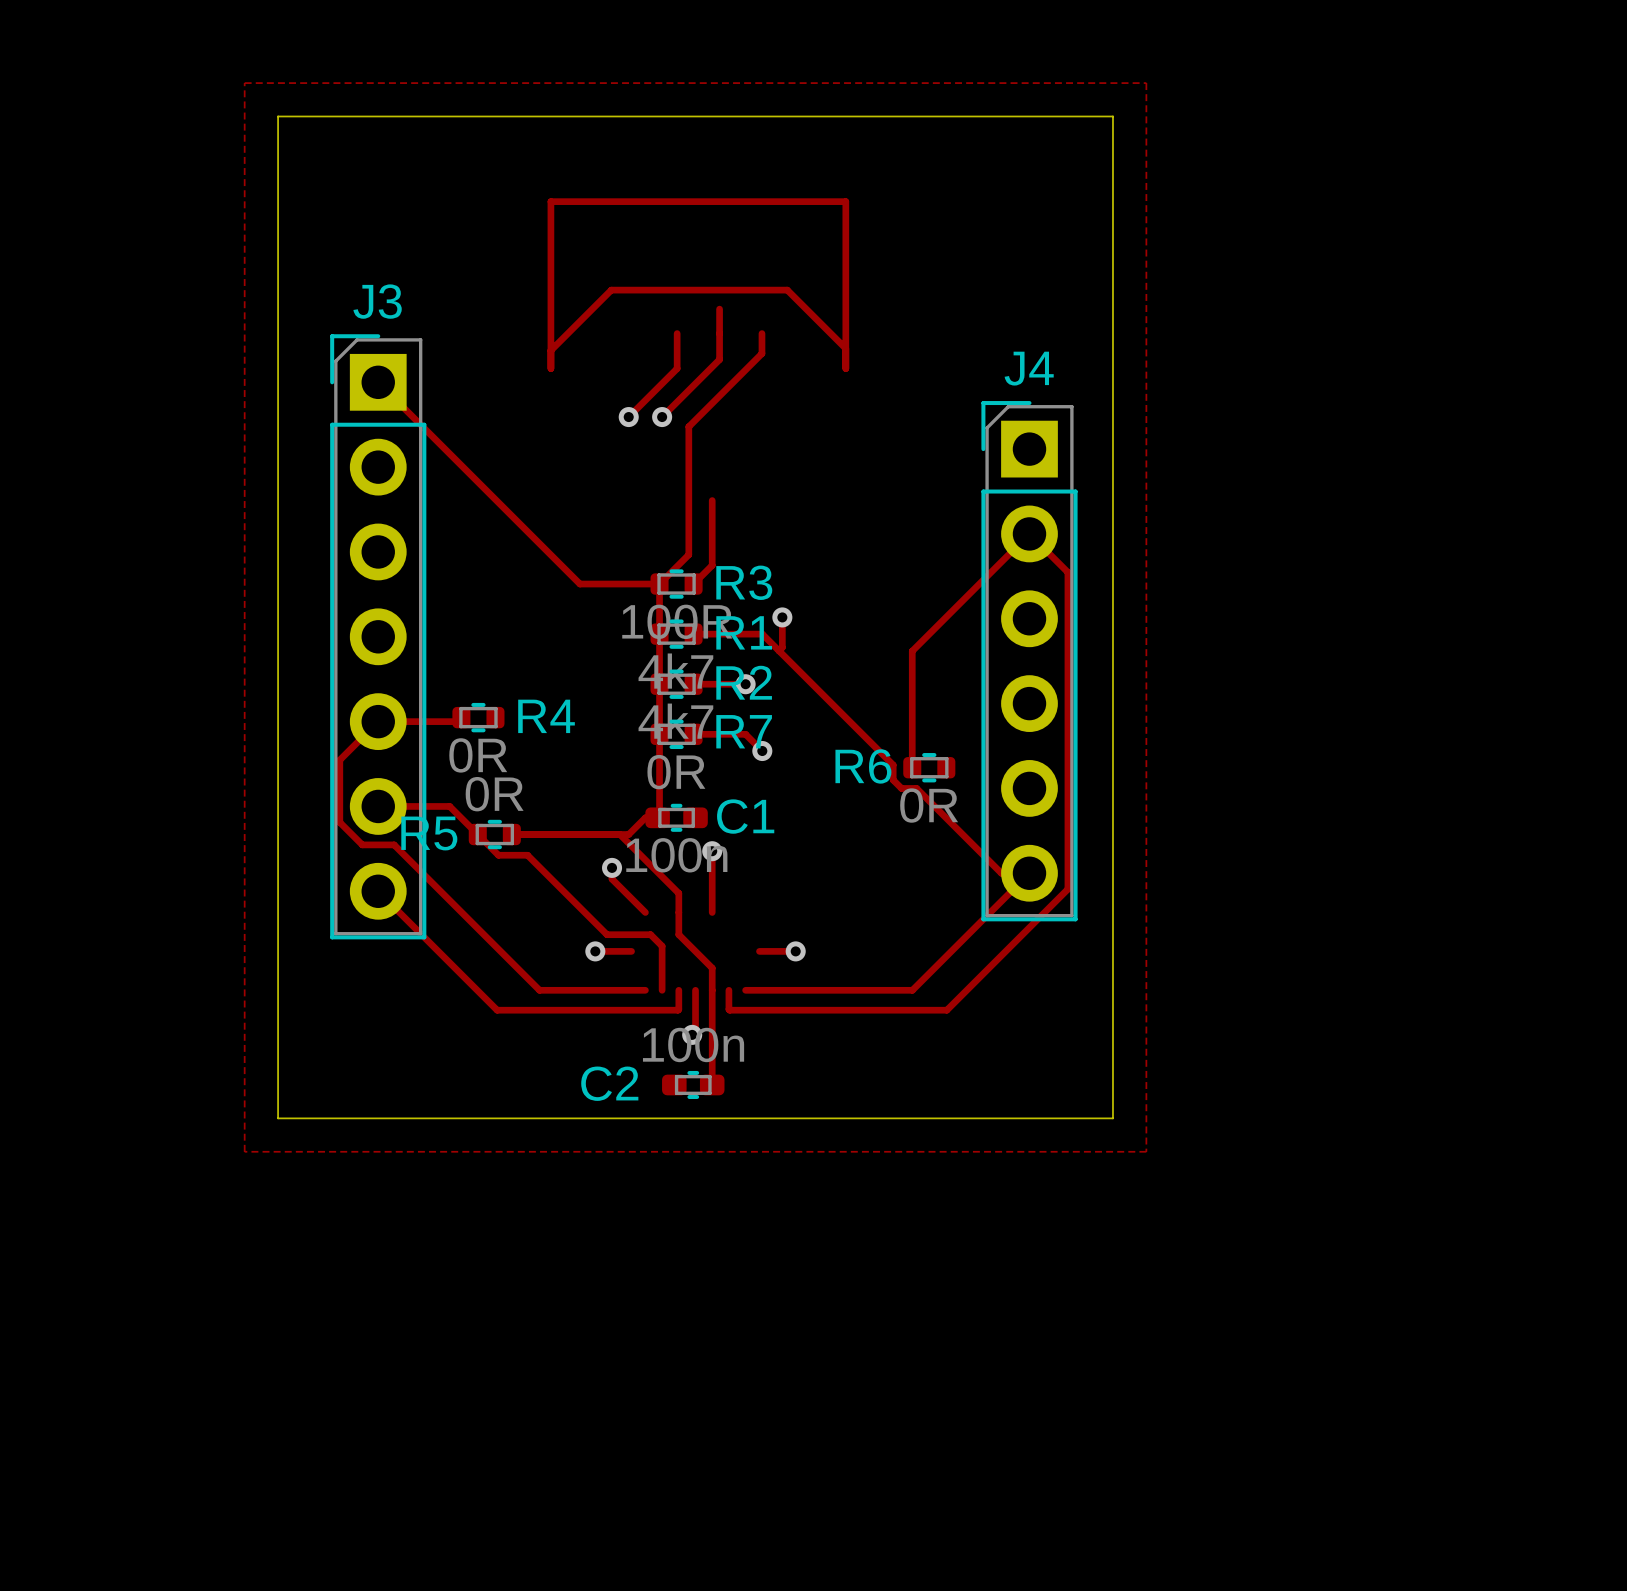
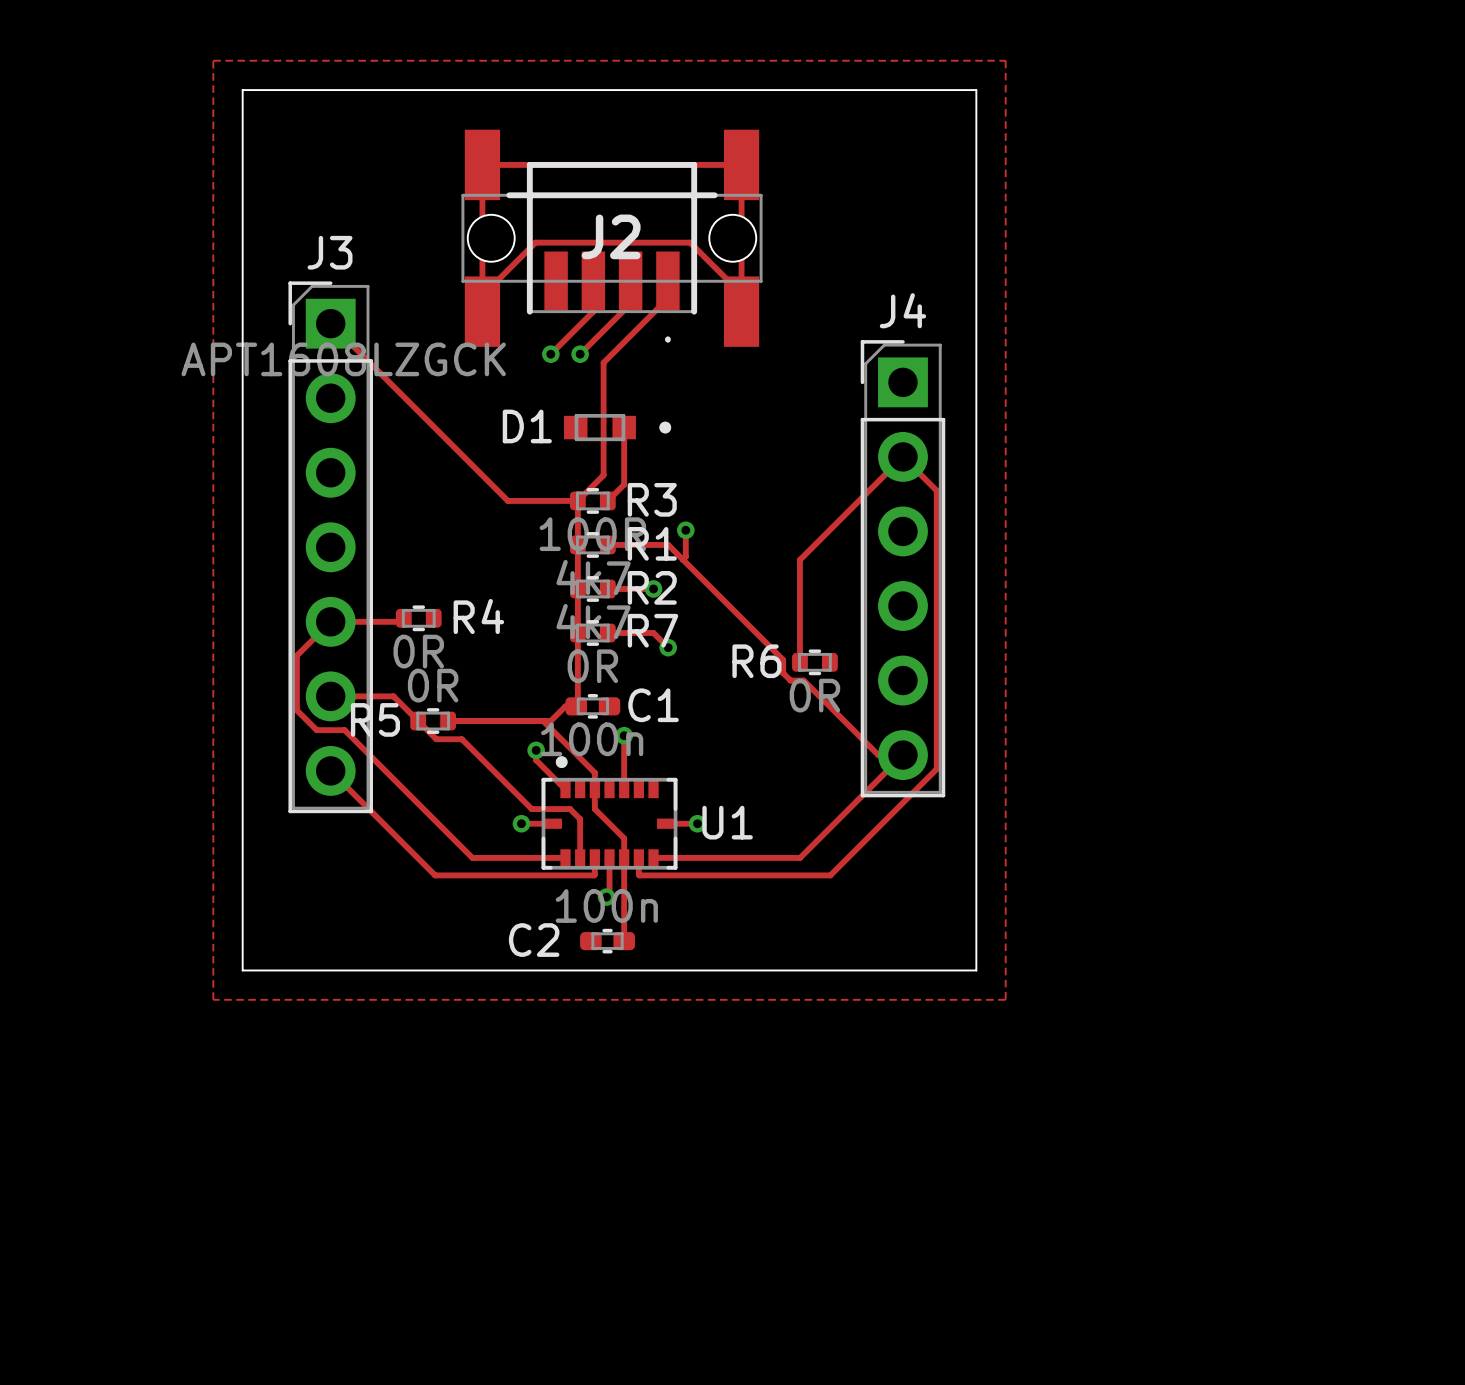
J2: none -> (612, 238)
D1: none -> APT1608LZGCK (617, 427)
U1: none -> (609, 812)

